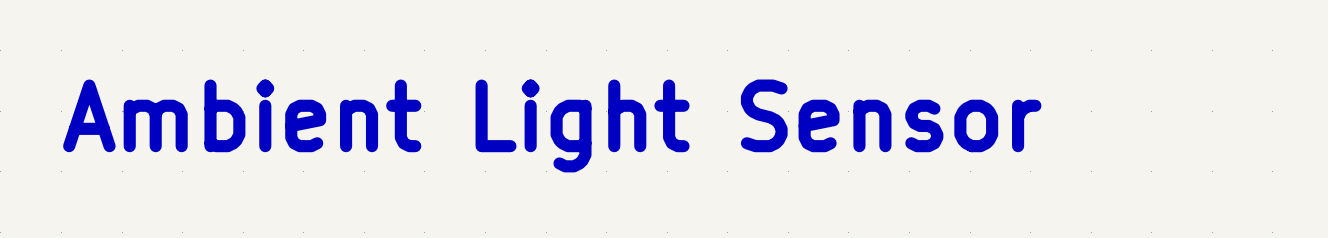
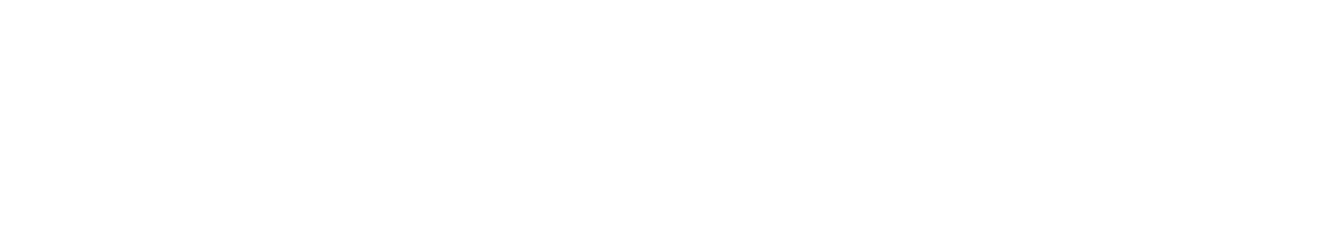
text: Ambient Light Sensor (552, 125) -> none

